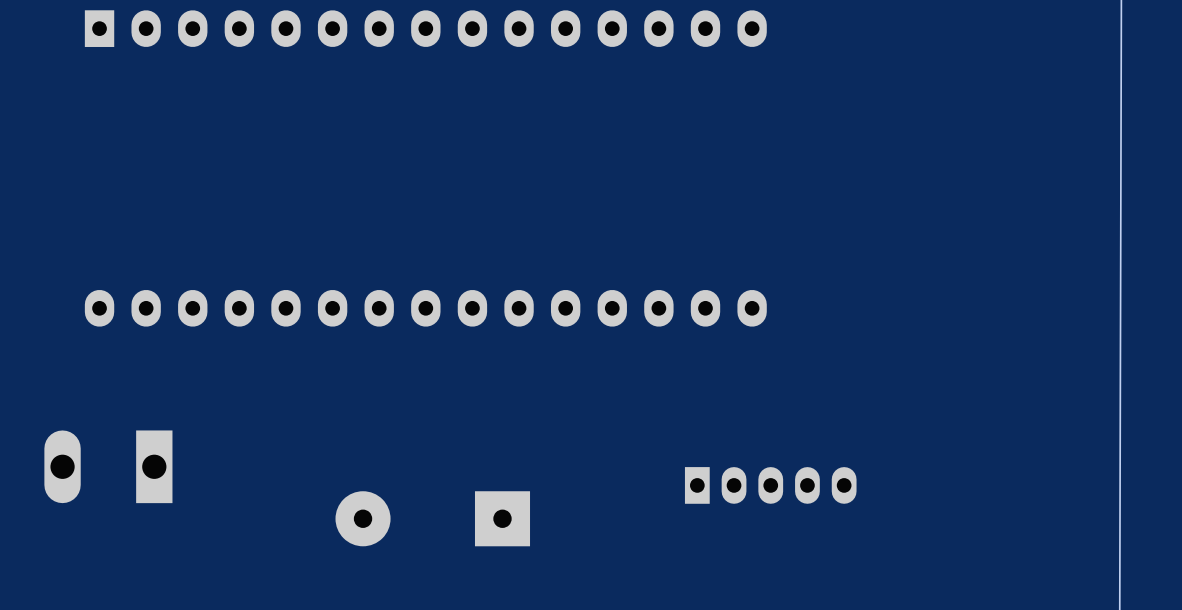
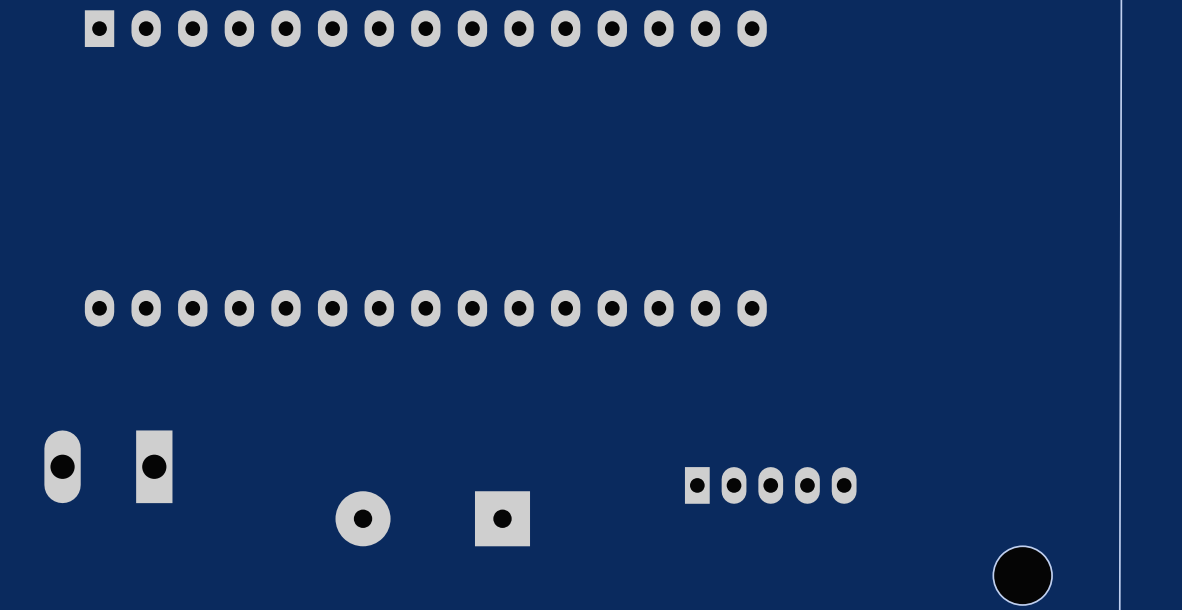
part: none -> (1022, 575)

